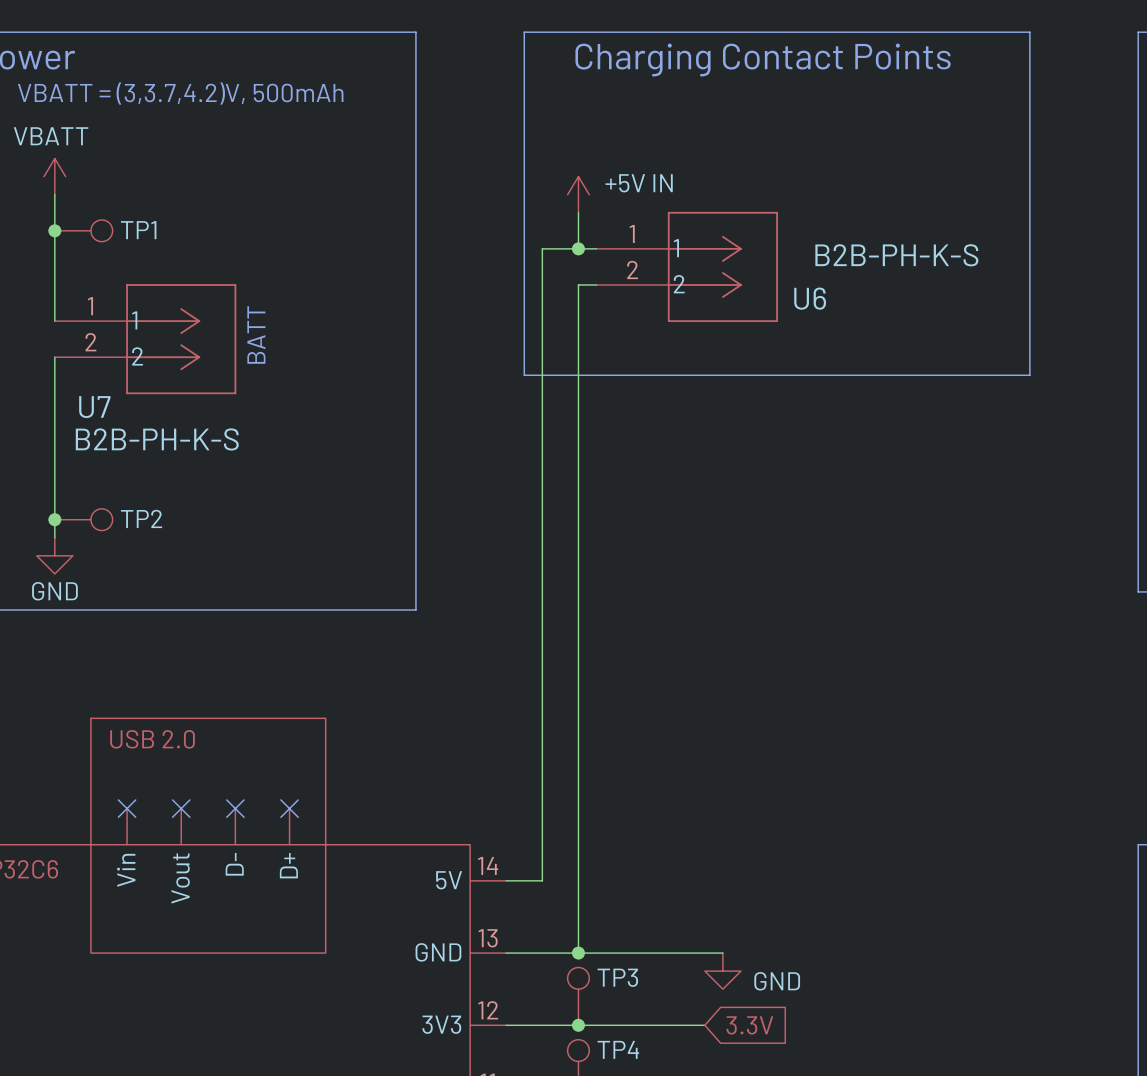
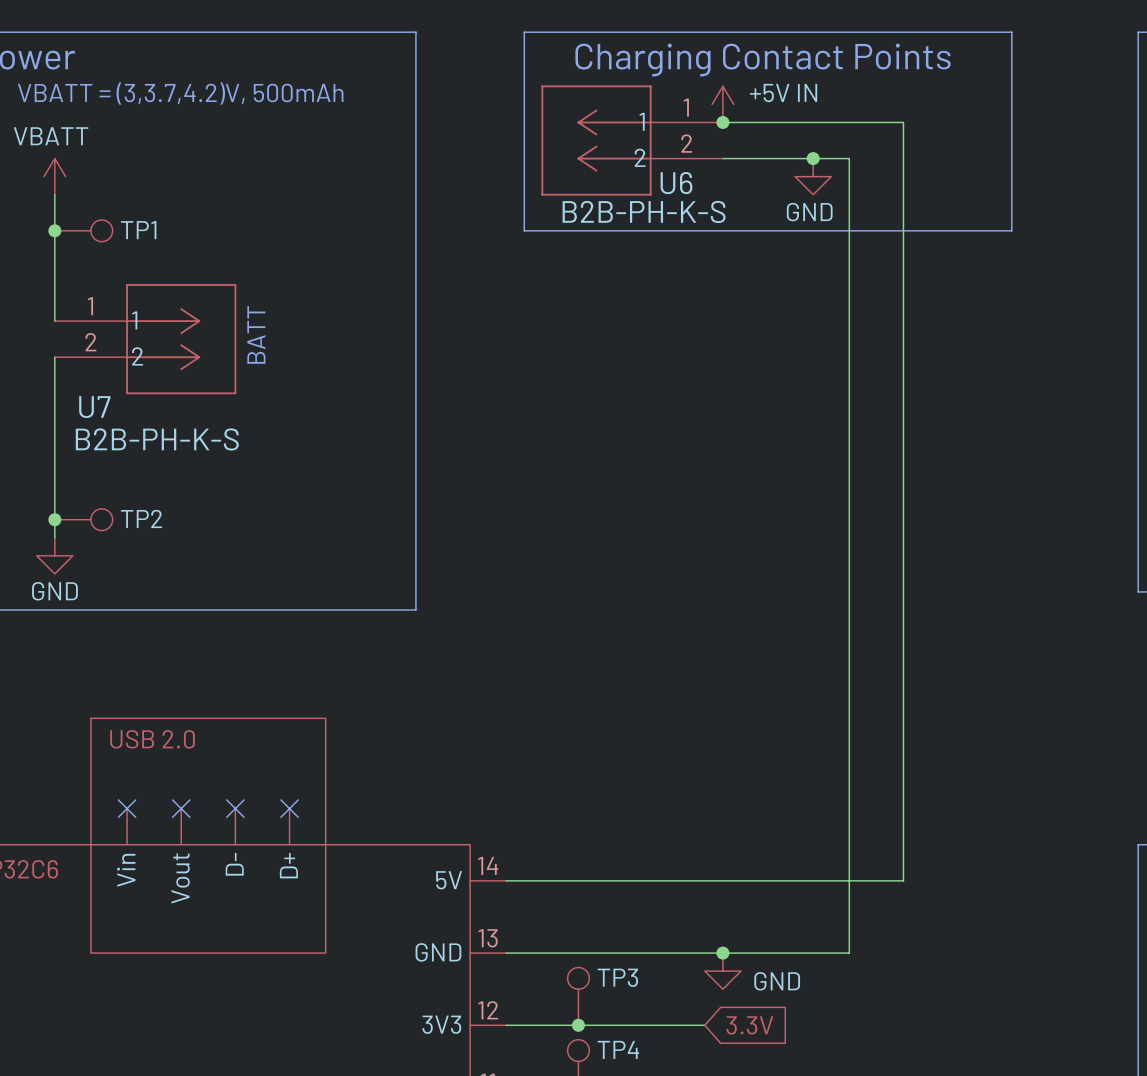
line: (1011, 32) (1029, 32) (1029, 375) (524, 375) (524, 230) -> (1011, 32) (1011, 230) (524, 230)
junction: none -> (722, 122)
wire: none -> (722, 158) (849, 158) (849, 953) (722, 953)
junction: none -> (813, 158)
power symbol: none -> GND (813, 176)
power symbol position: +5V IN (578, 194) -> +5V IN (722, 104)
wire: (578, 212) (578, 248) -> none
junction: (578, 248) -> none
wire: (596, 248) (542, 248) (542, 880) -> (722, 122) (903, 122) (903, 880) (542, 880)
U6 value position: B2B-PH-K-S (896, 255) -> B2B-PH-K-S (644, 211)
U6 position: (687, 266) -> (632, 140)
U6 flip: as is (722, 266) -> left-right (596, 140)
wire: (596, 284) (578, 284) (578, 953) -> none
U6 name position: U6 (810, 298) -> U6 (676, 183)
junction: (578, 953) -> none
junction: none -> (722, 953)

